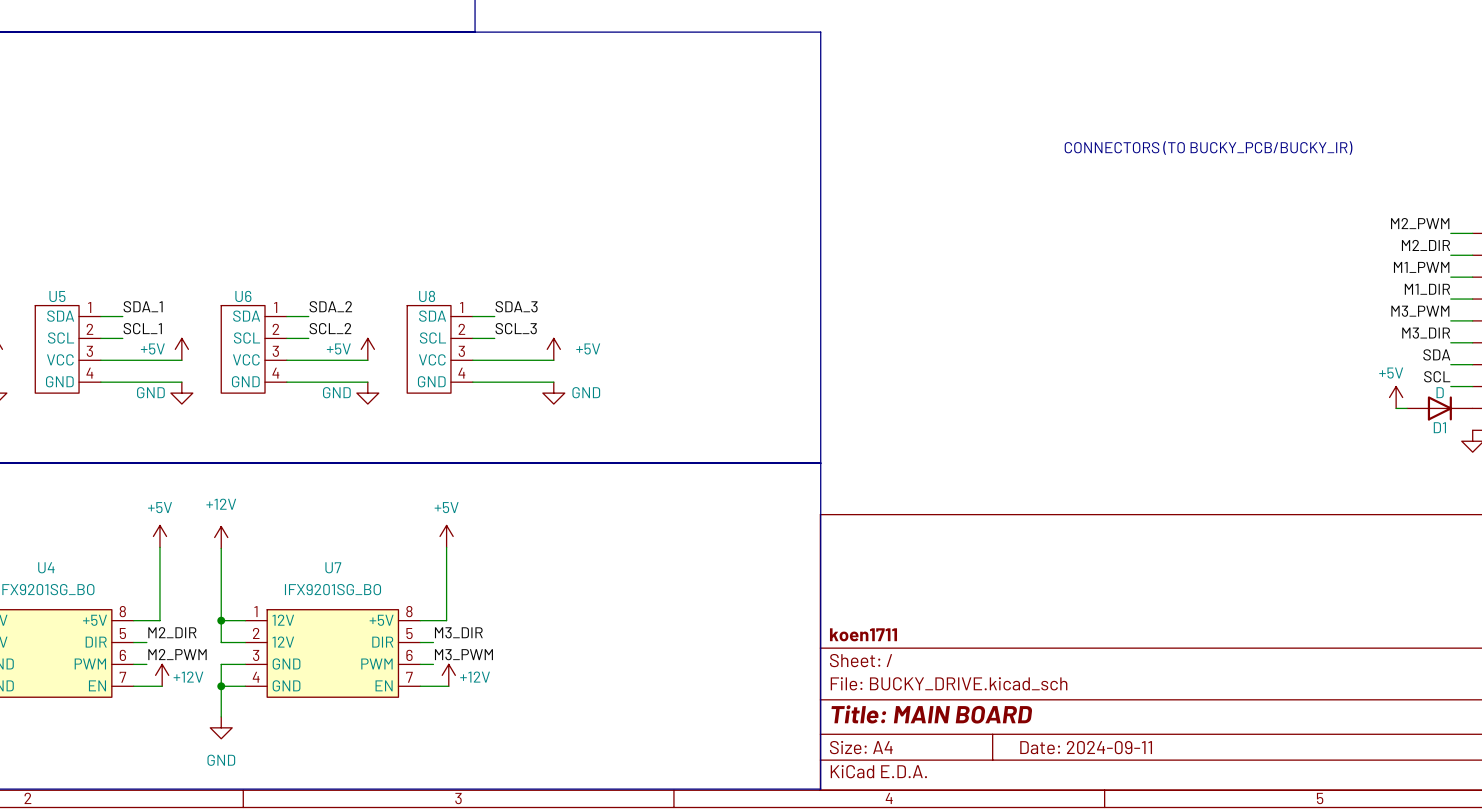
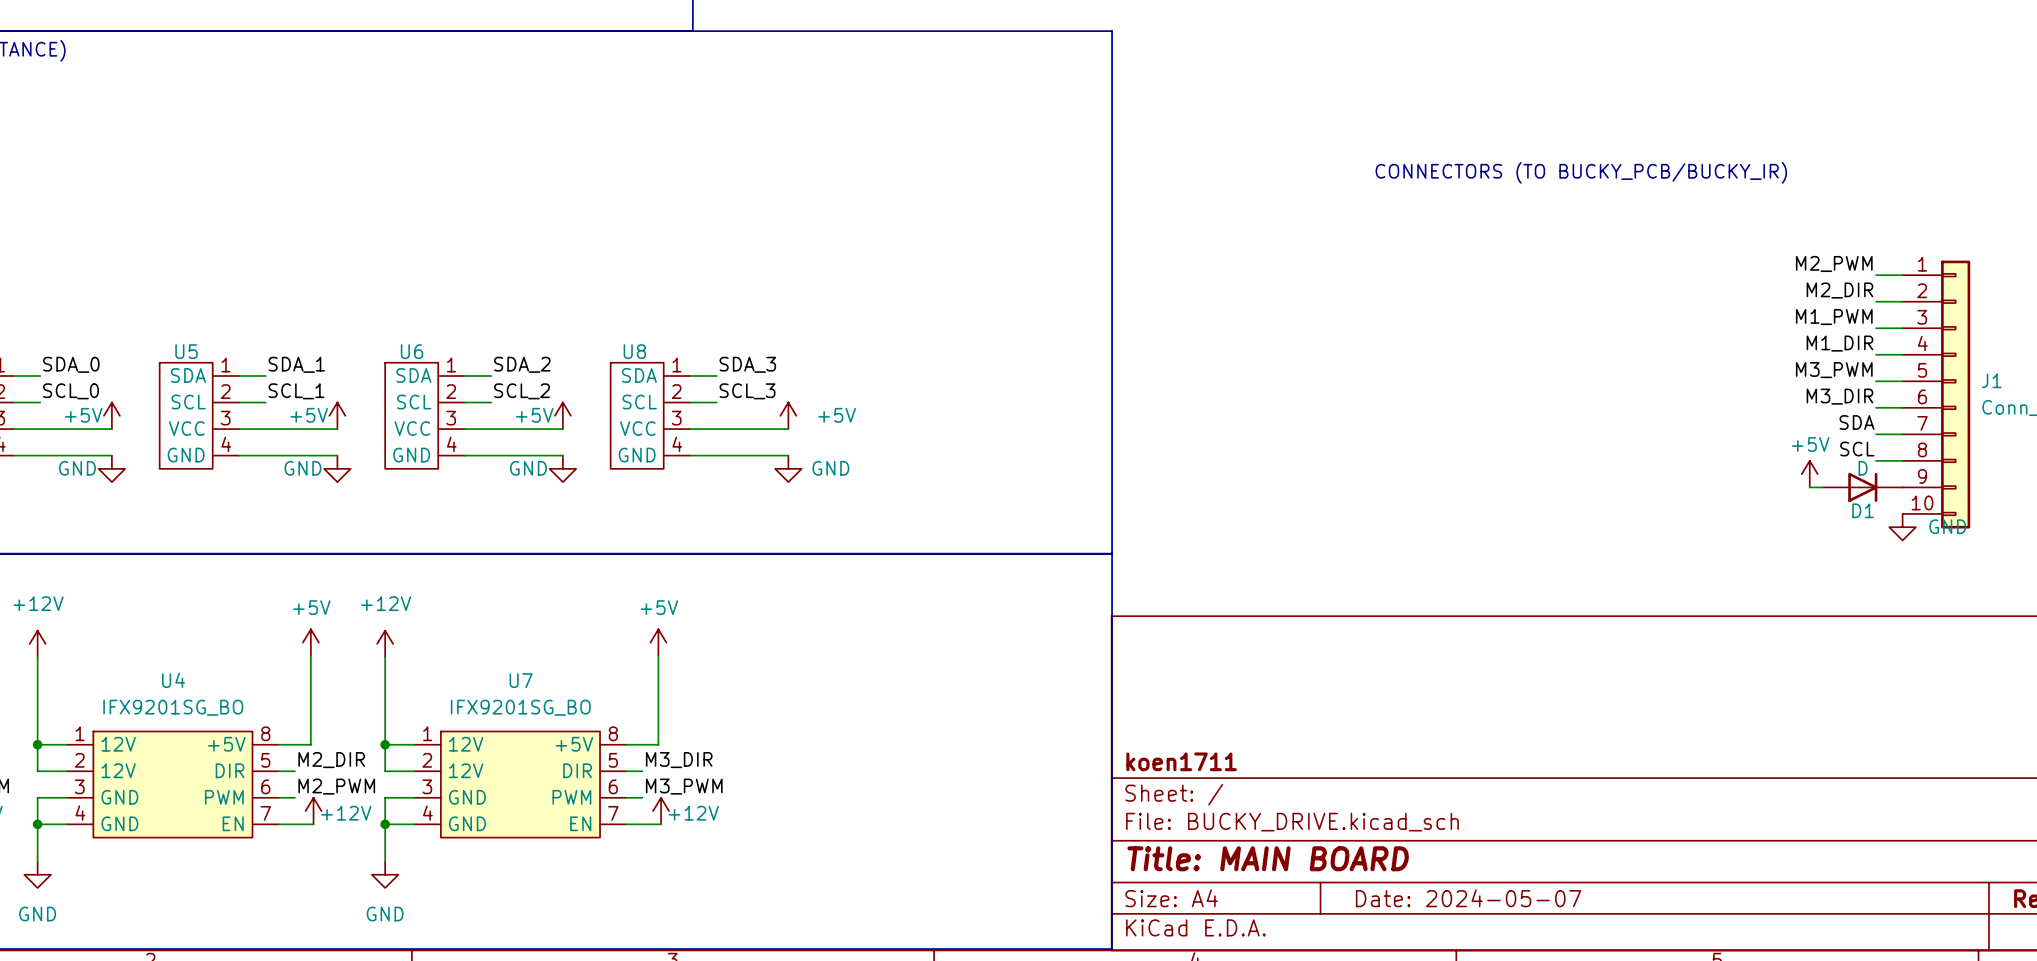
title block: Date: 2024-09-11 (1086, 747) -> Date: 2024-05-07 (1468, 898)

